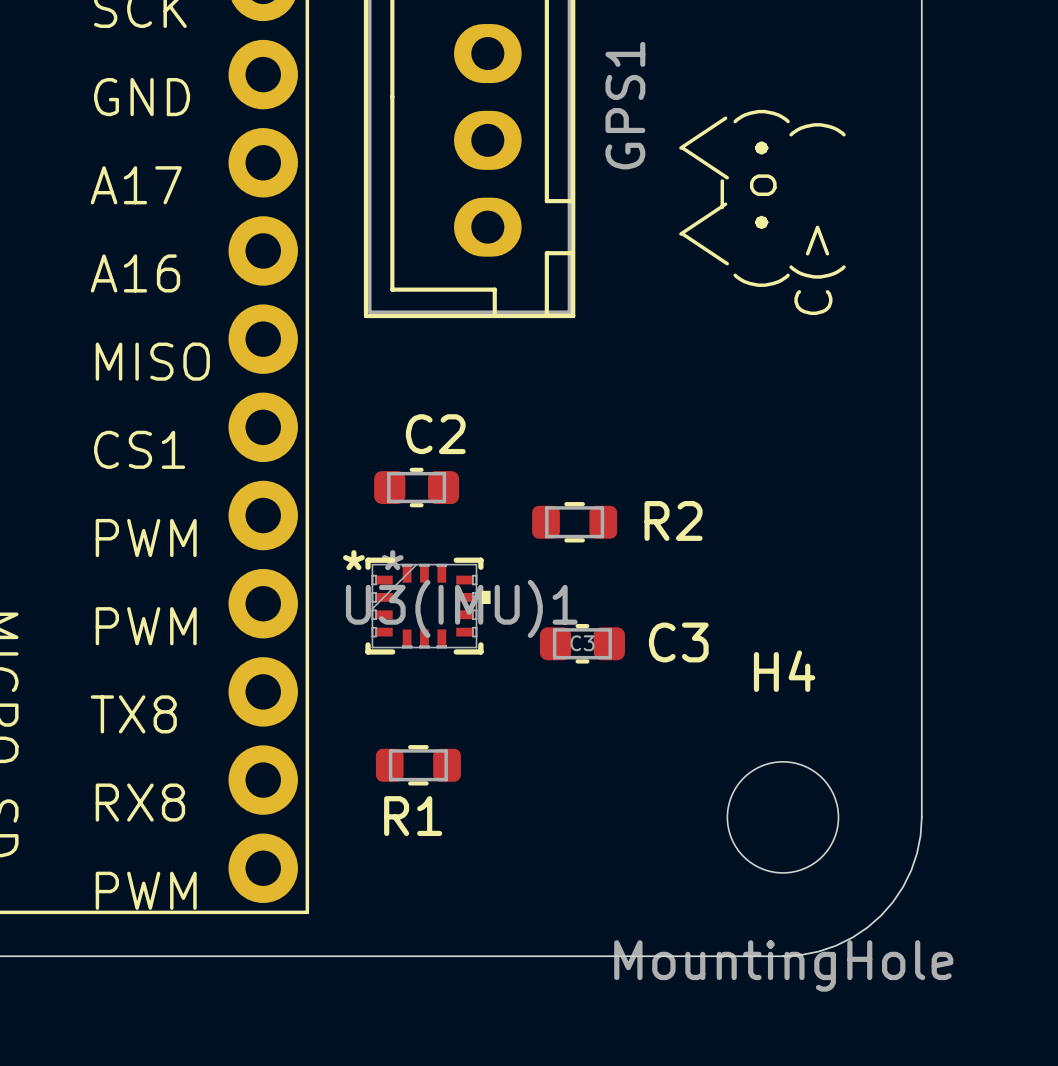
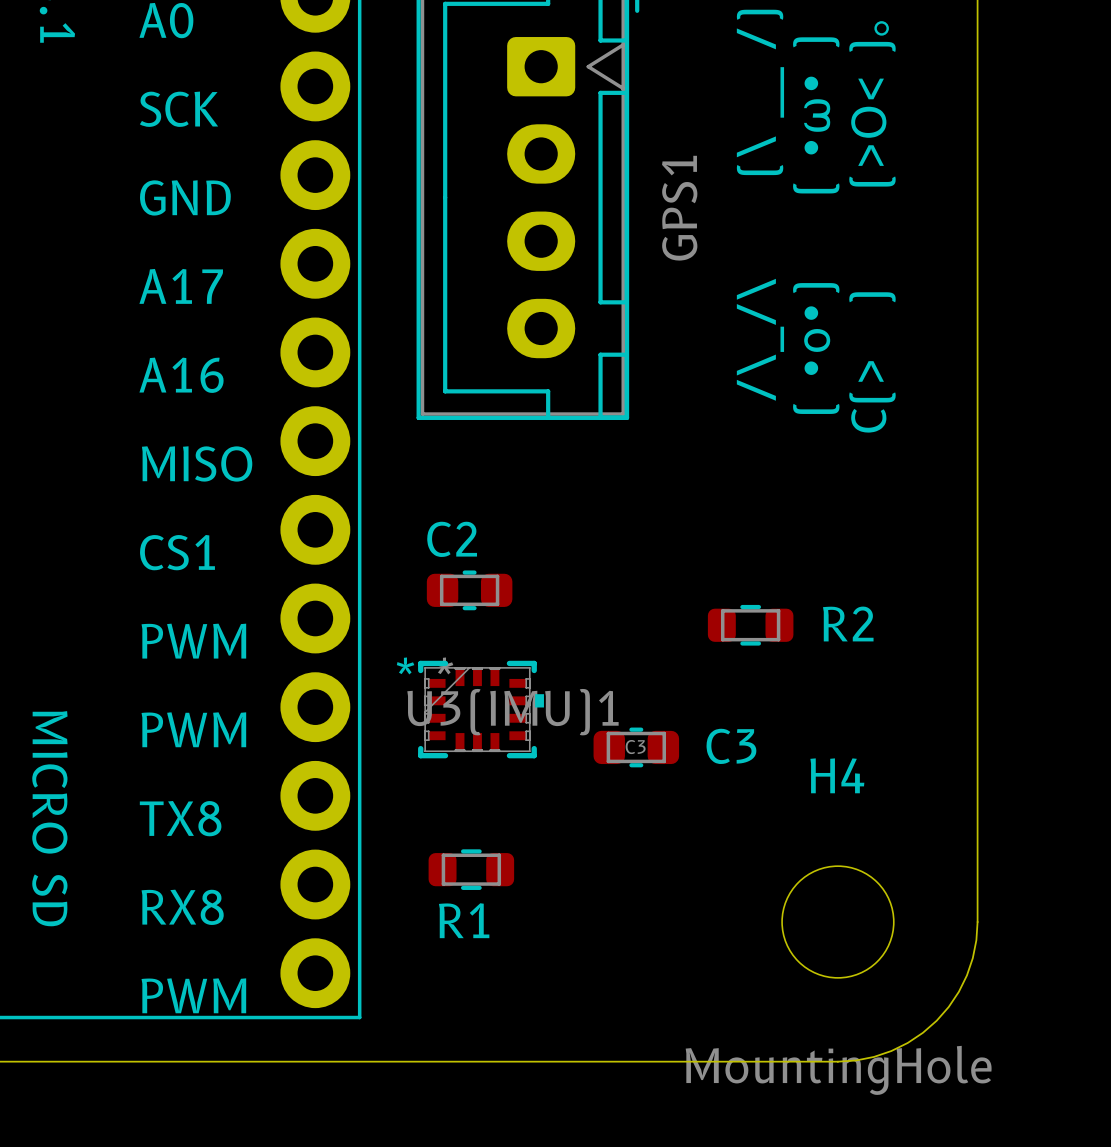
C2 name position: C2 (435, 434) -> C2 (452, 539)
R2 position: (574, 522) -> (750, 625)

